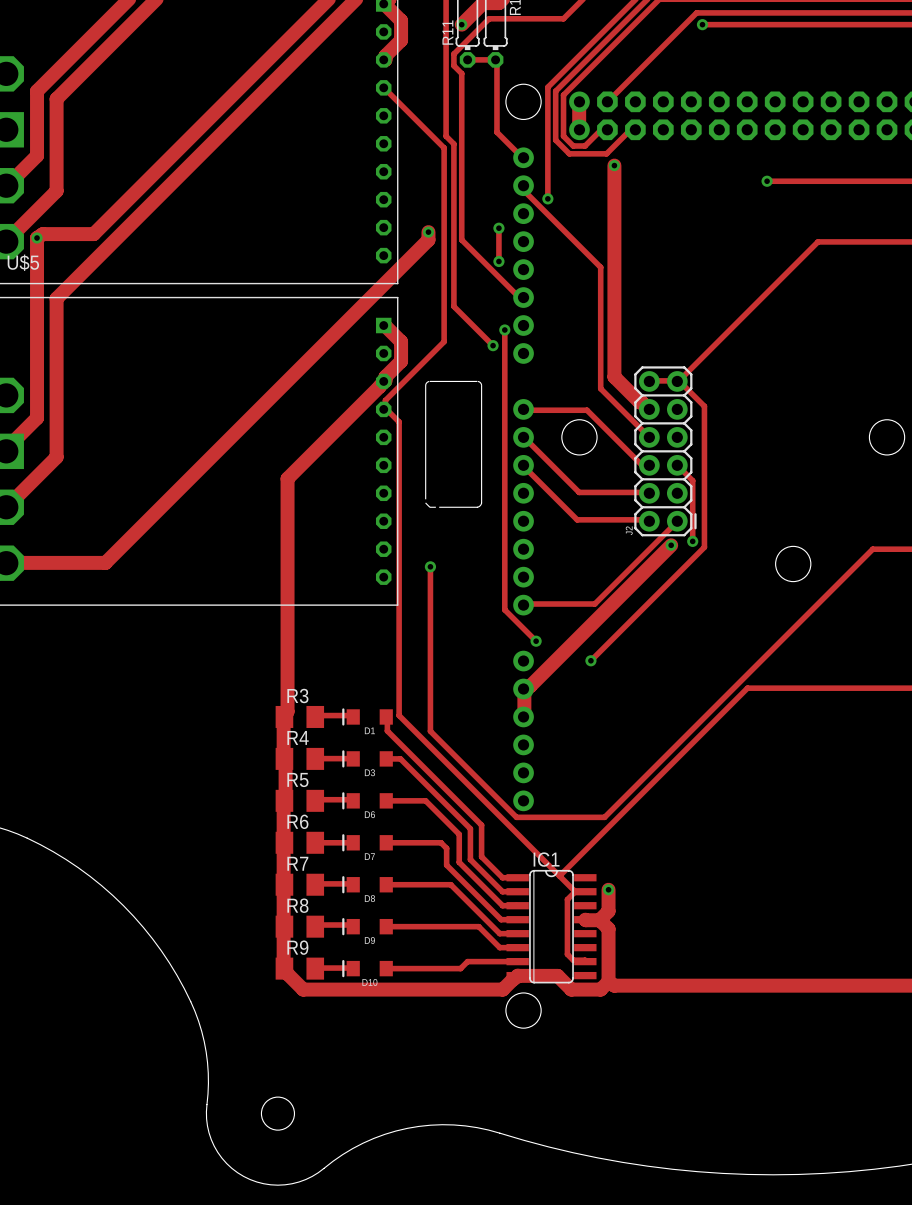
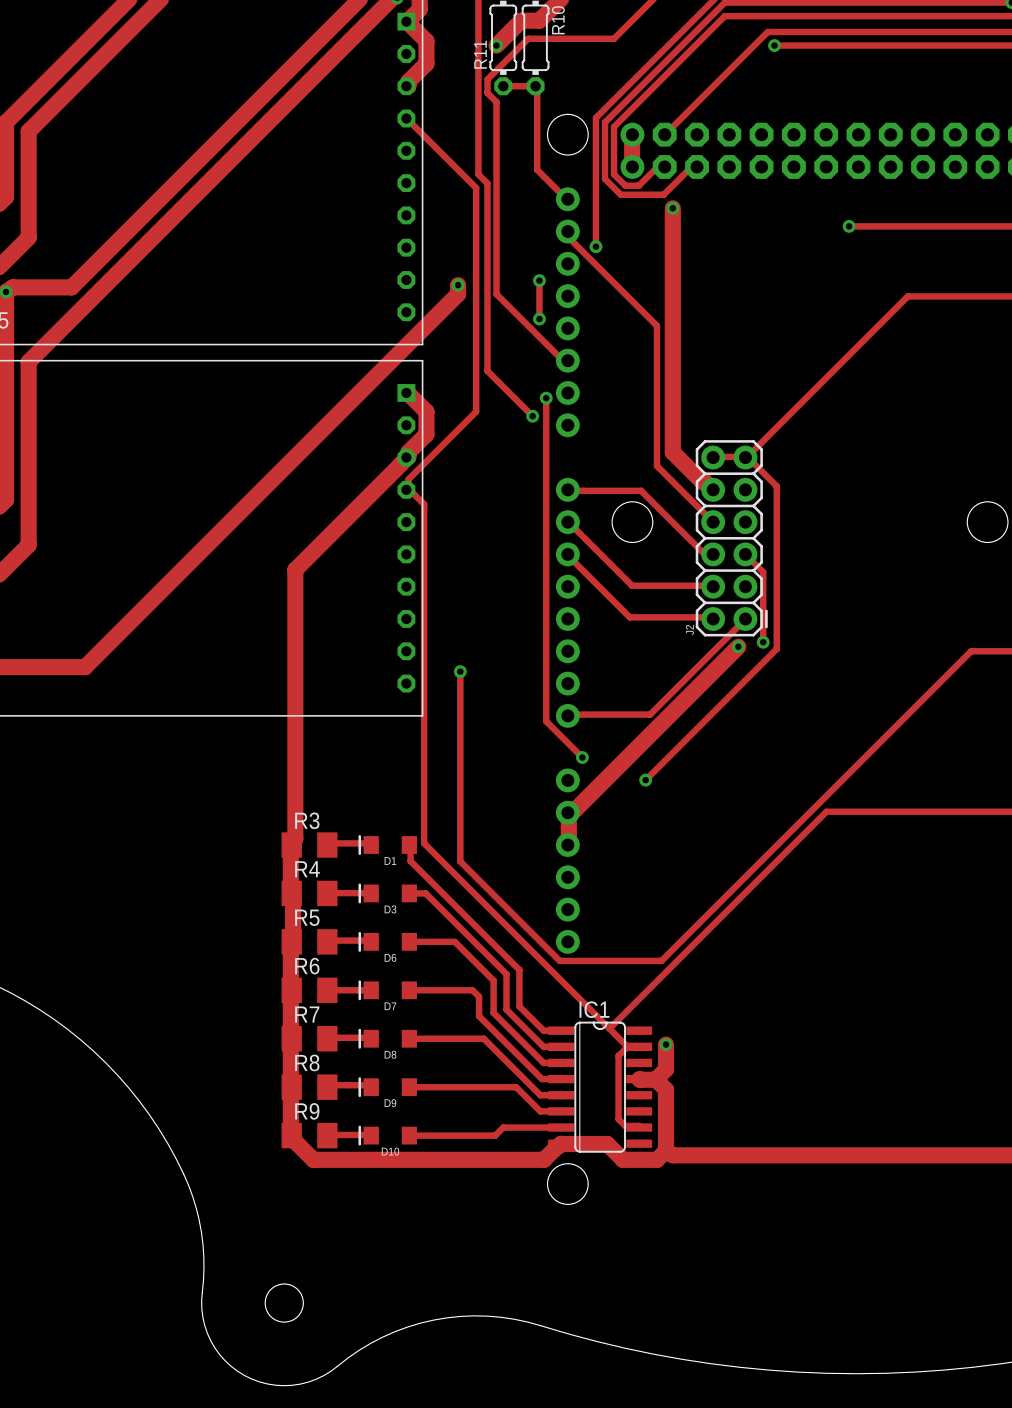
board edge: (429, 381) (477, 381) (481, 384) (481, 503) (478, 507) (429, 507) (425, 503) (425, 385) (429, 381) -> none
round board edge: [775, 545, 812, 583] -> none

